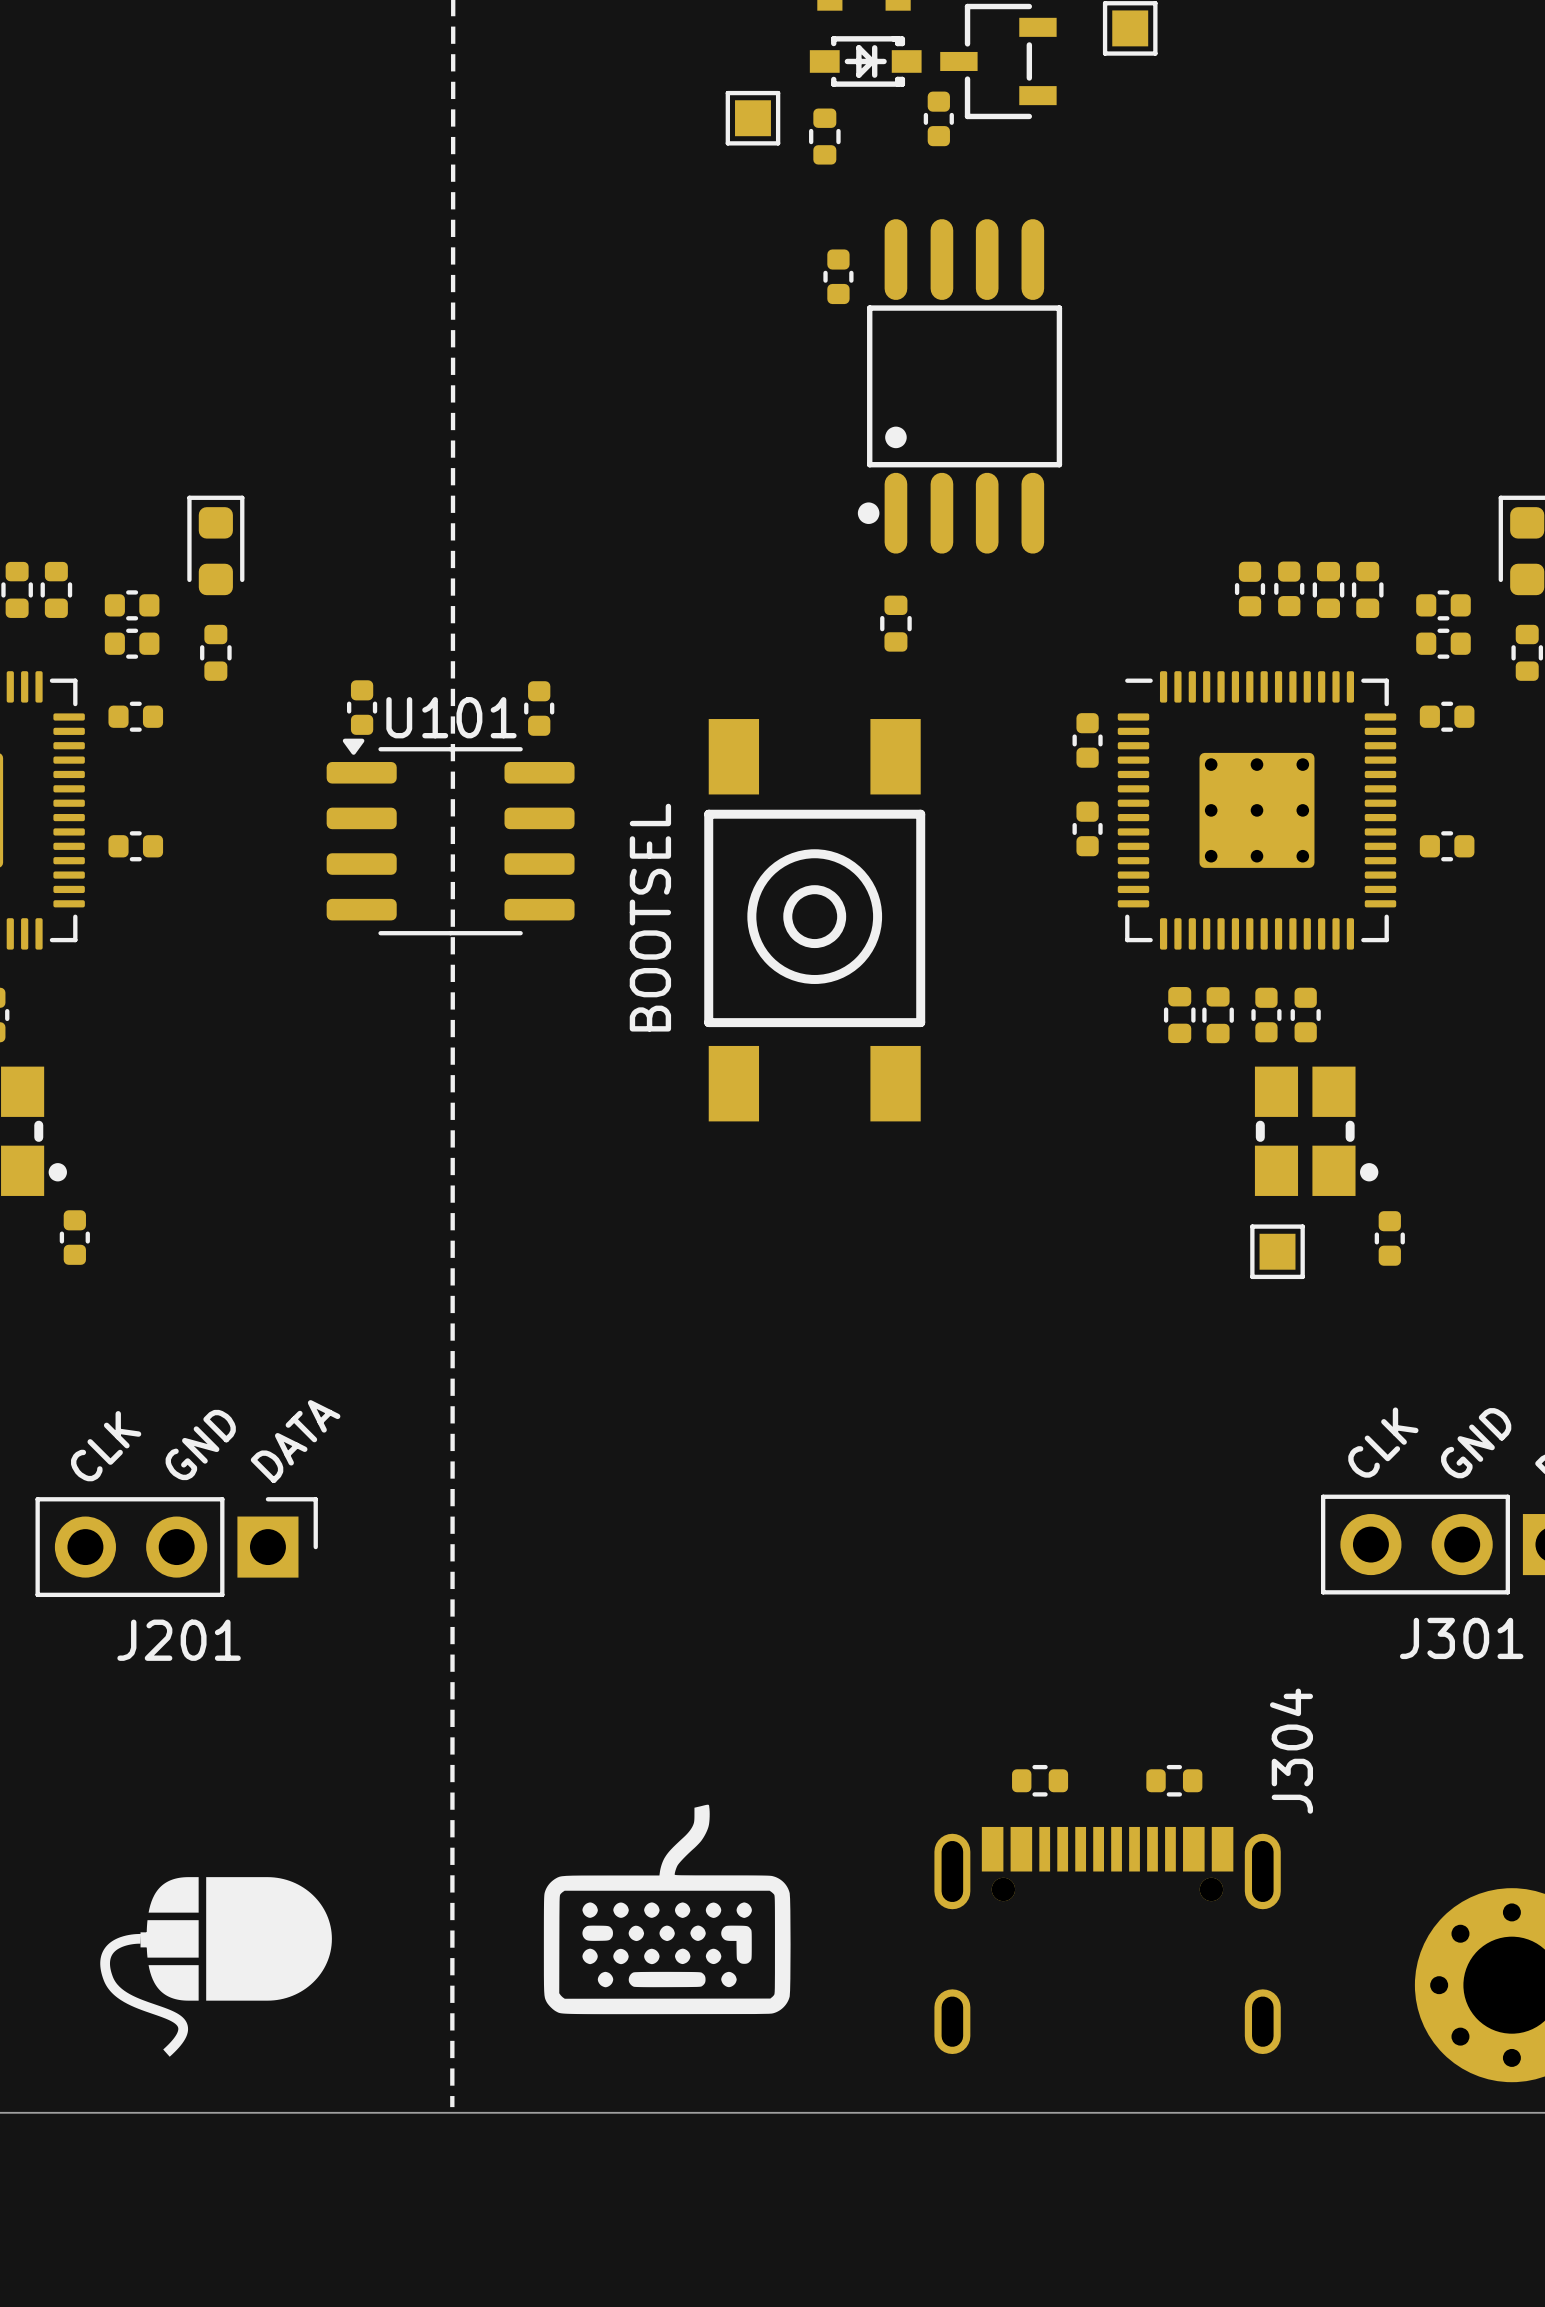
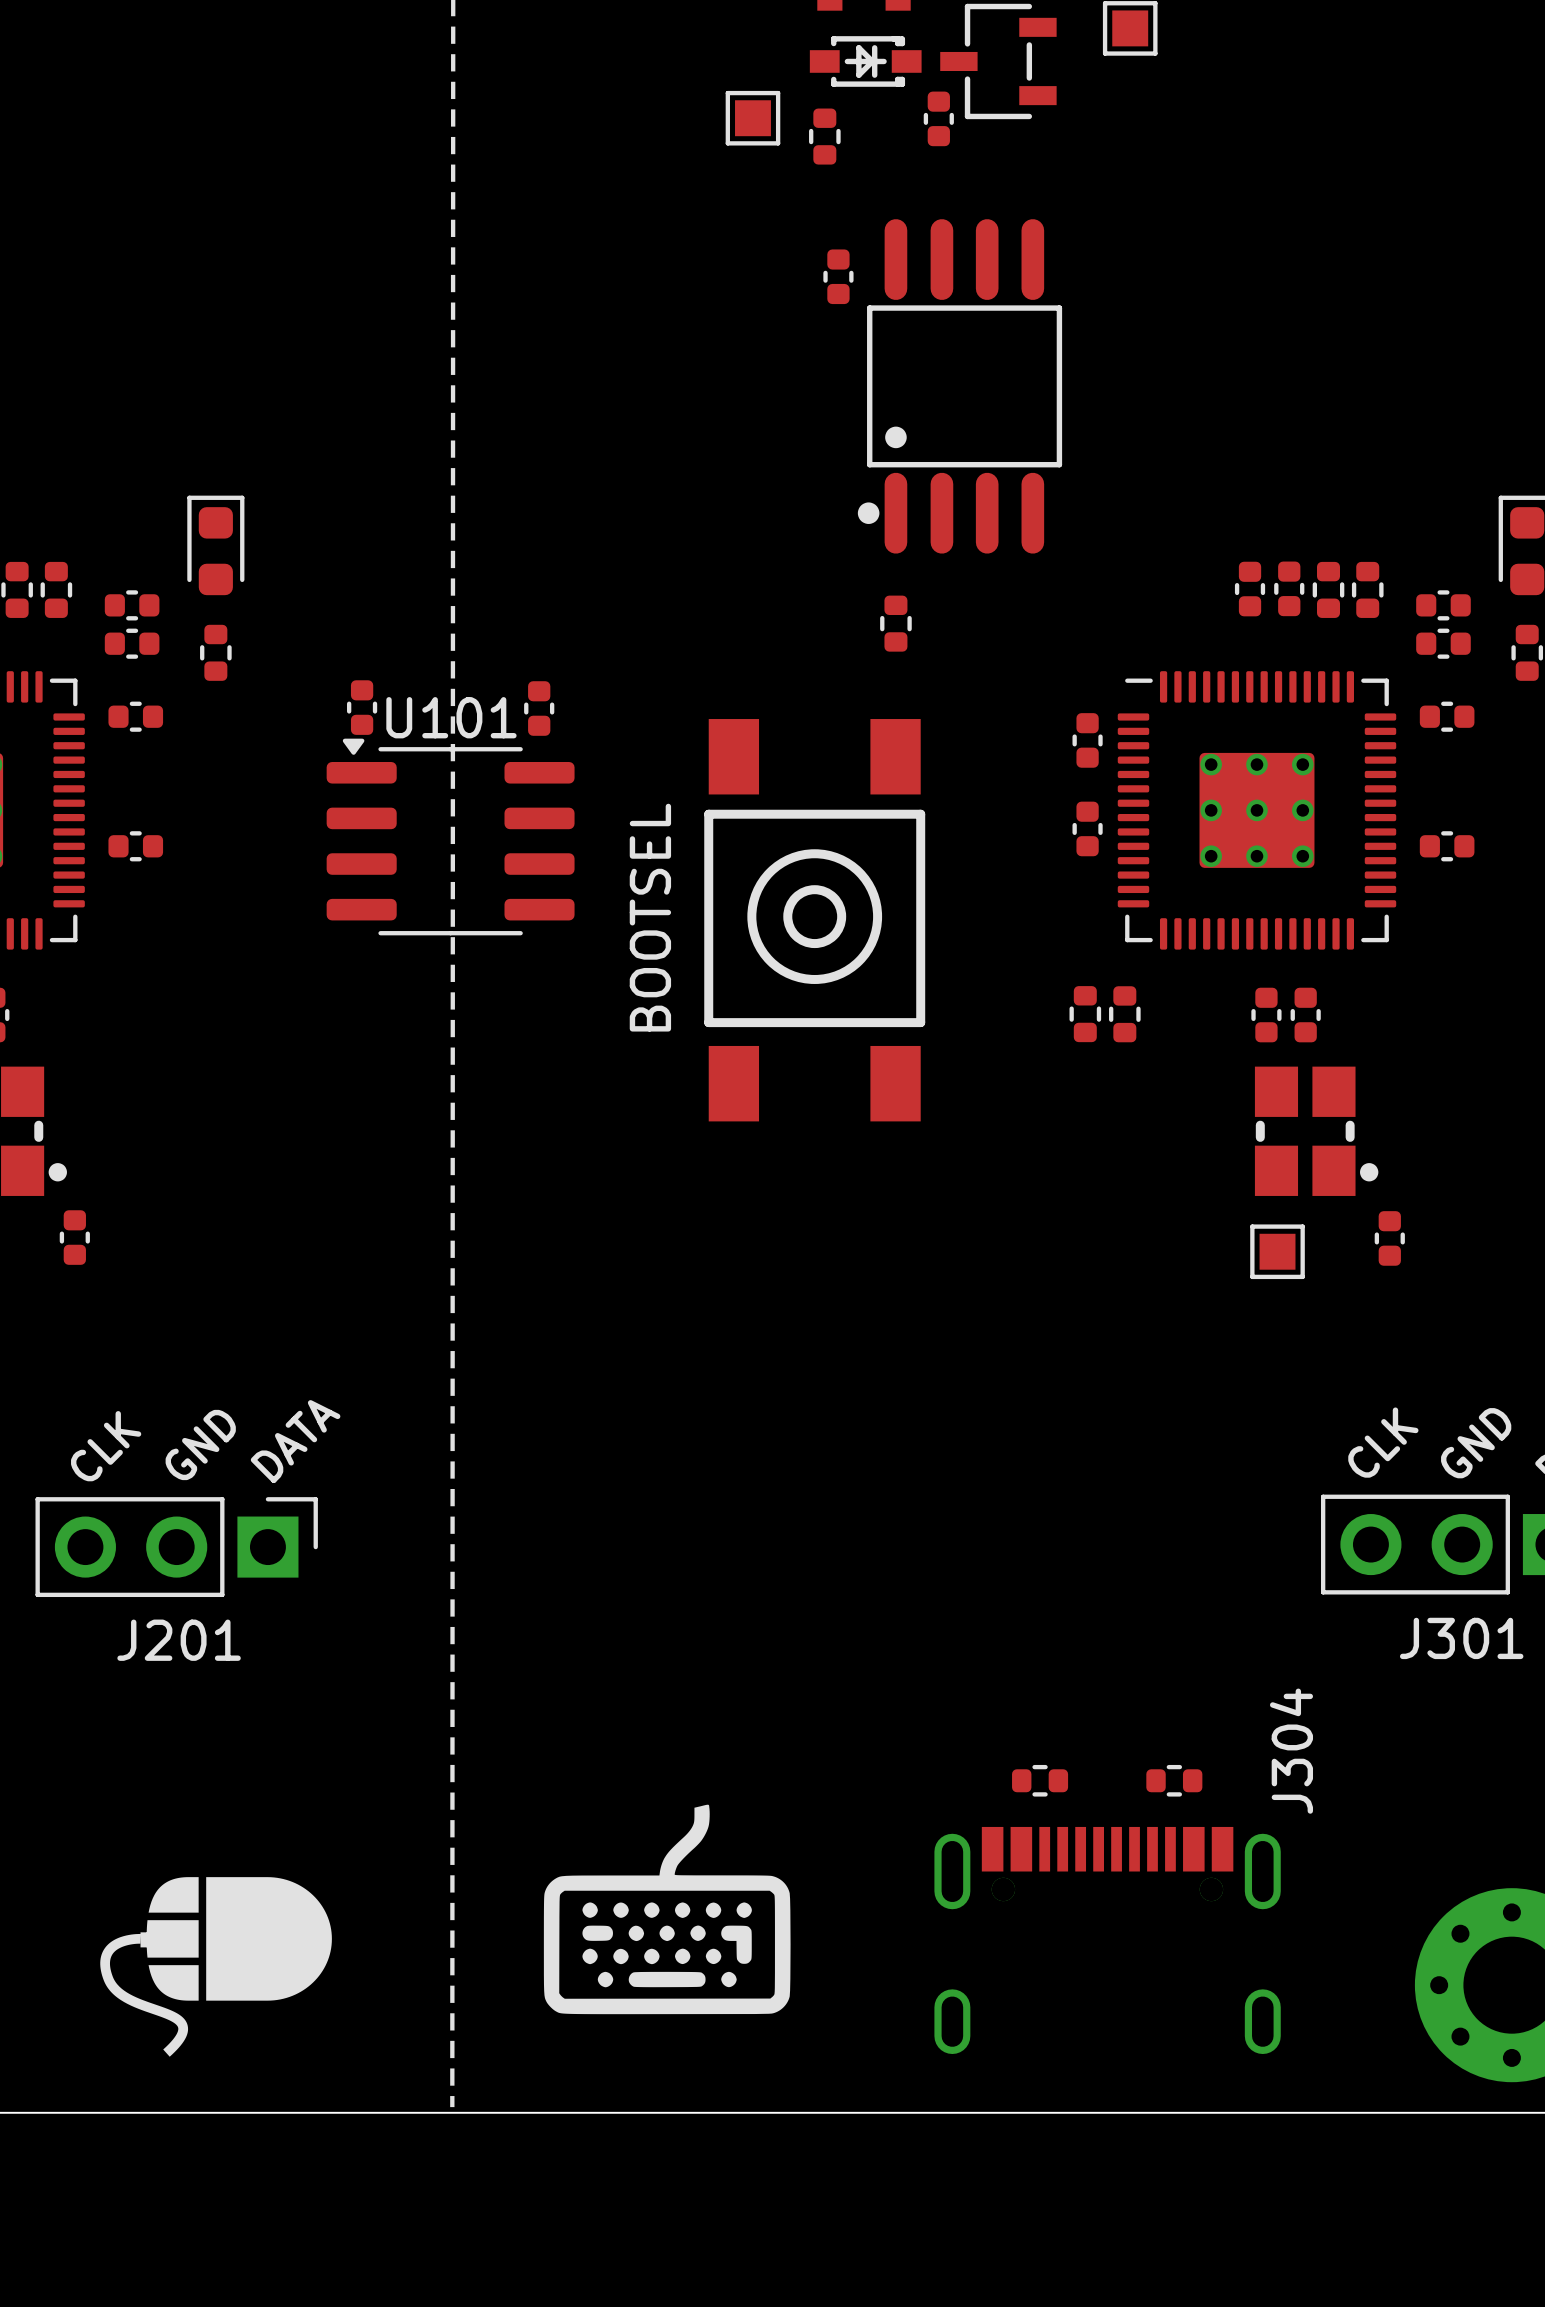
part: none -> (1085, 1014)
part: none -> (1124, 1014)
part: (1179, 1015) -> none
part: (1218, 1015) -> none

